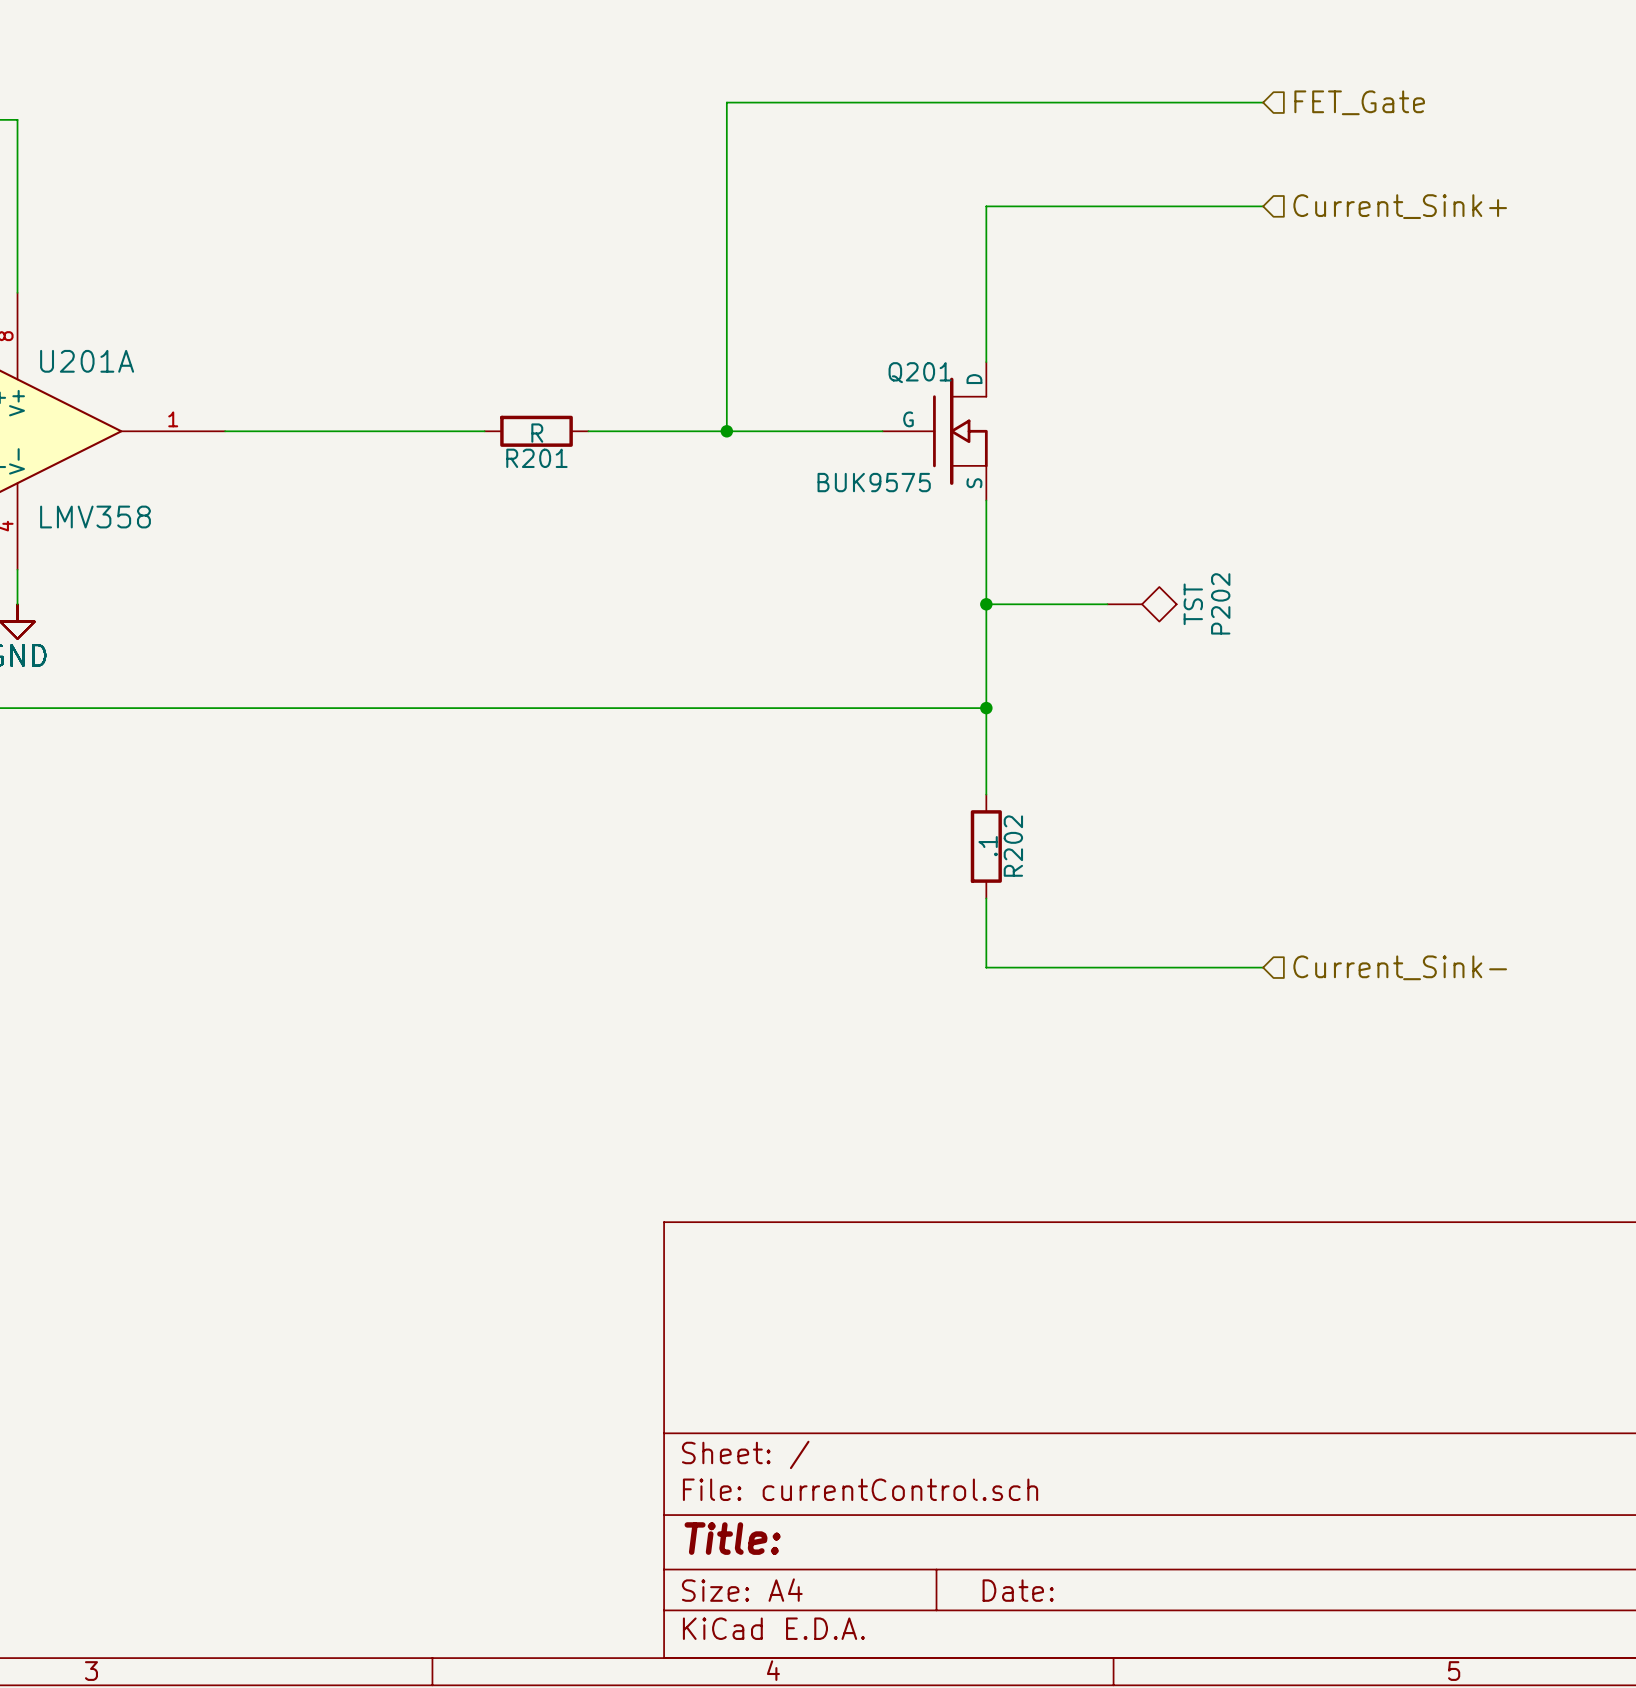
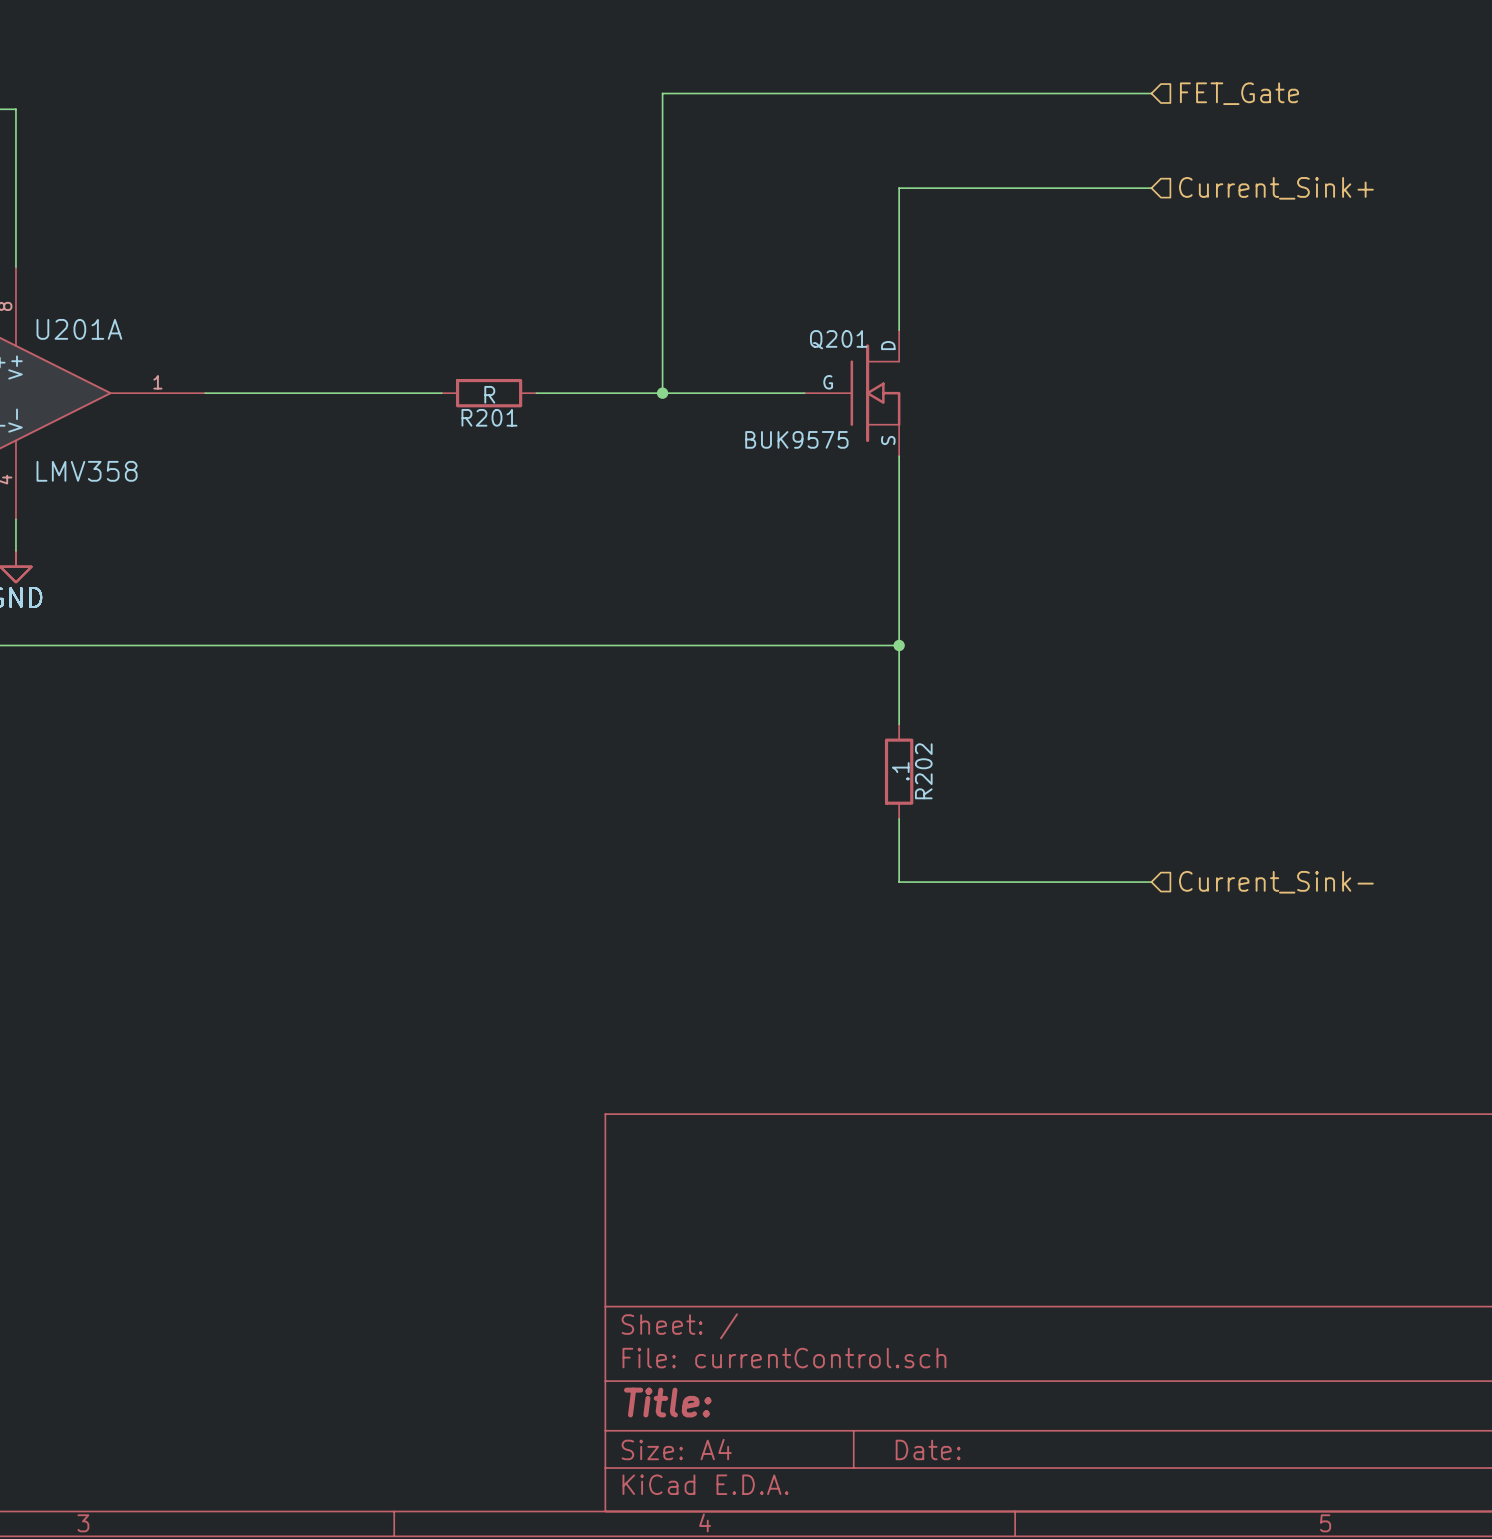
wire: (986, 604) (1107, 604) -> none
junction: (986, 604) -> none
P202: TST (1142, 604) -> none

